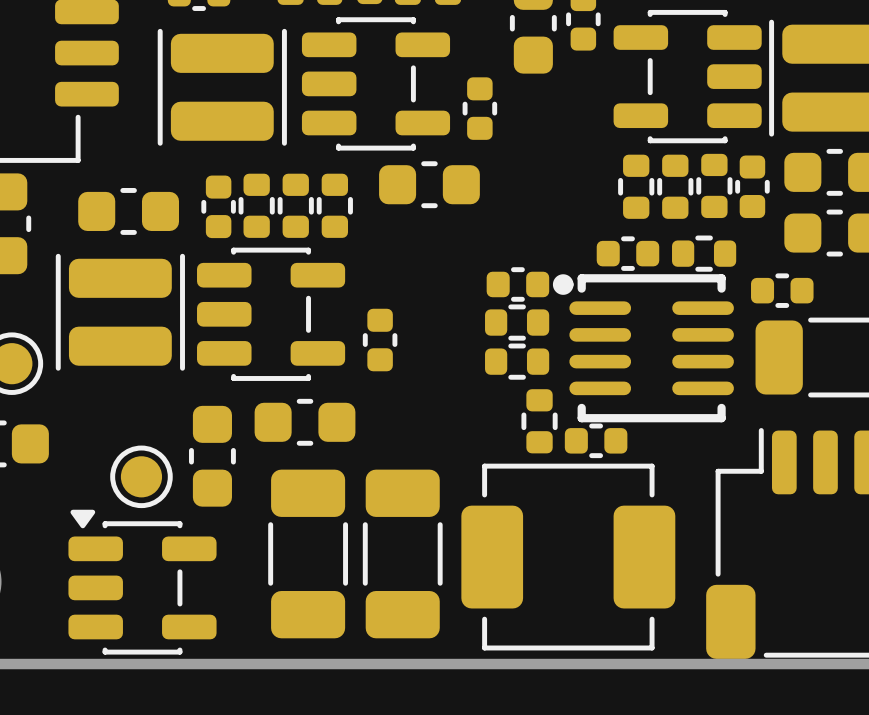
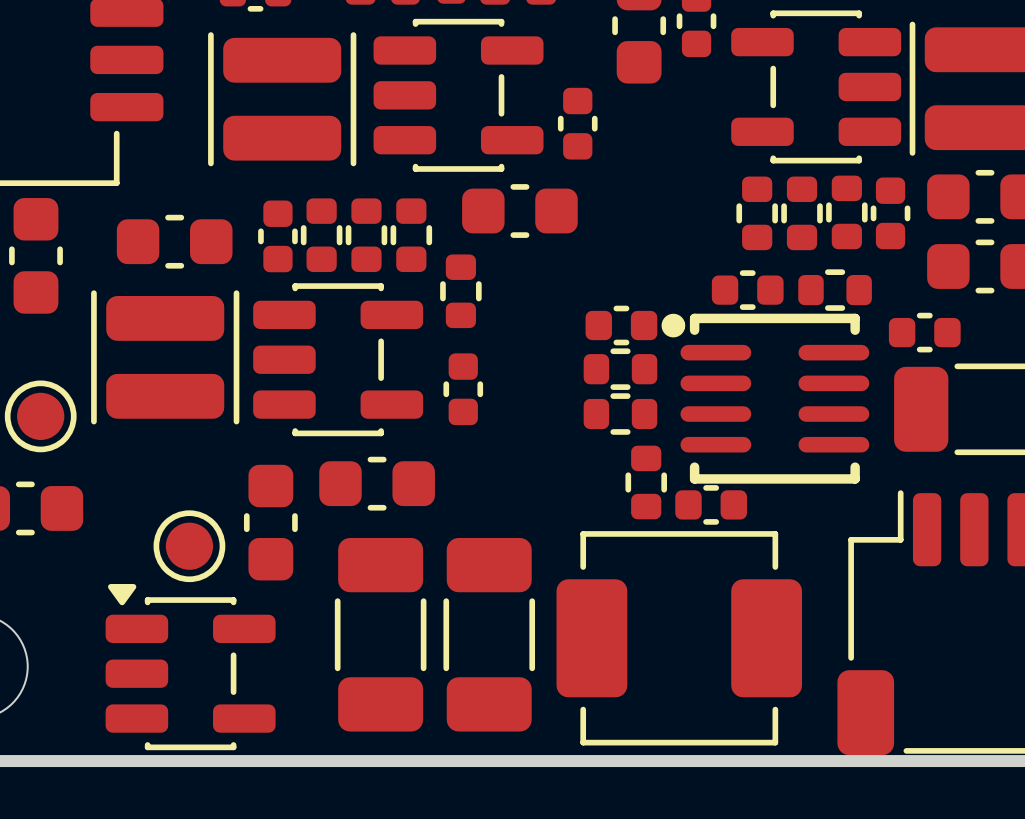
part: none -> (460, 291)

